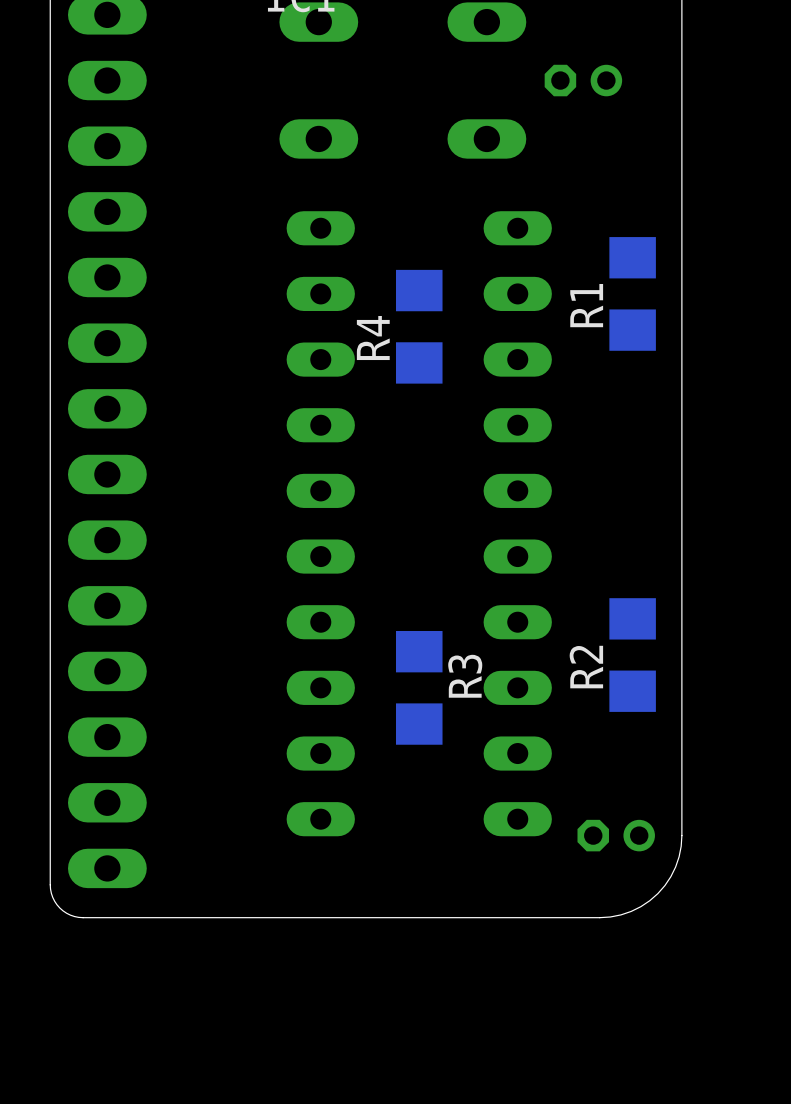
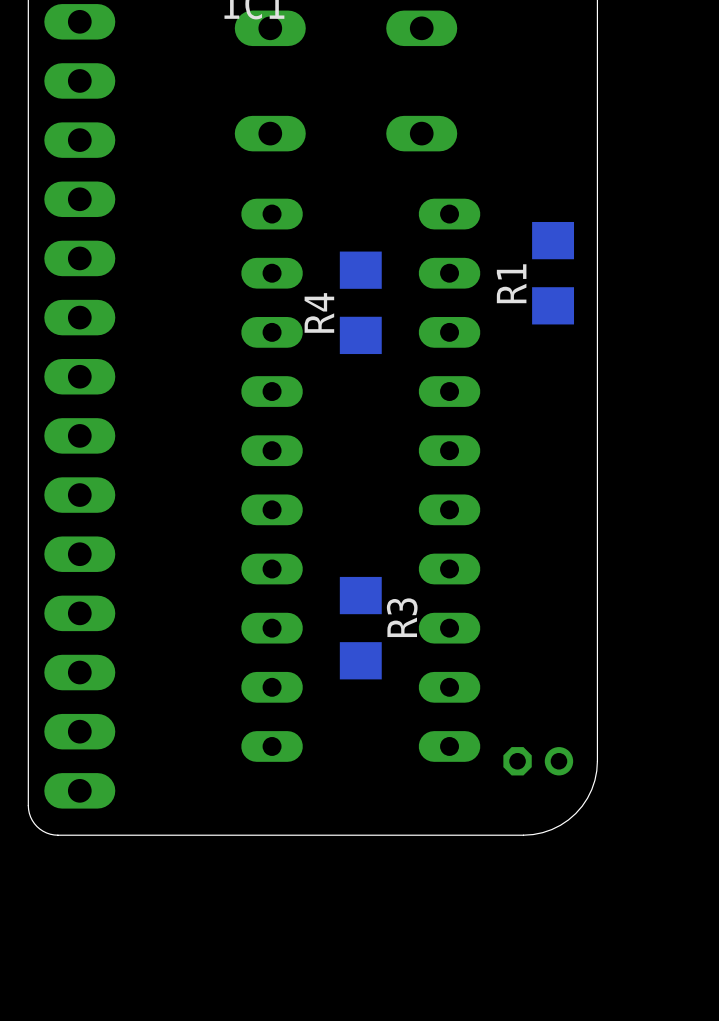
part: (583, 80) -> none
R2: (632, 655) -> none

